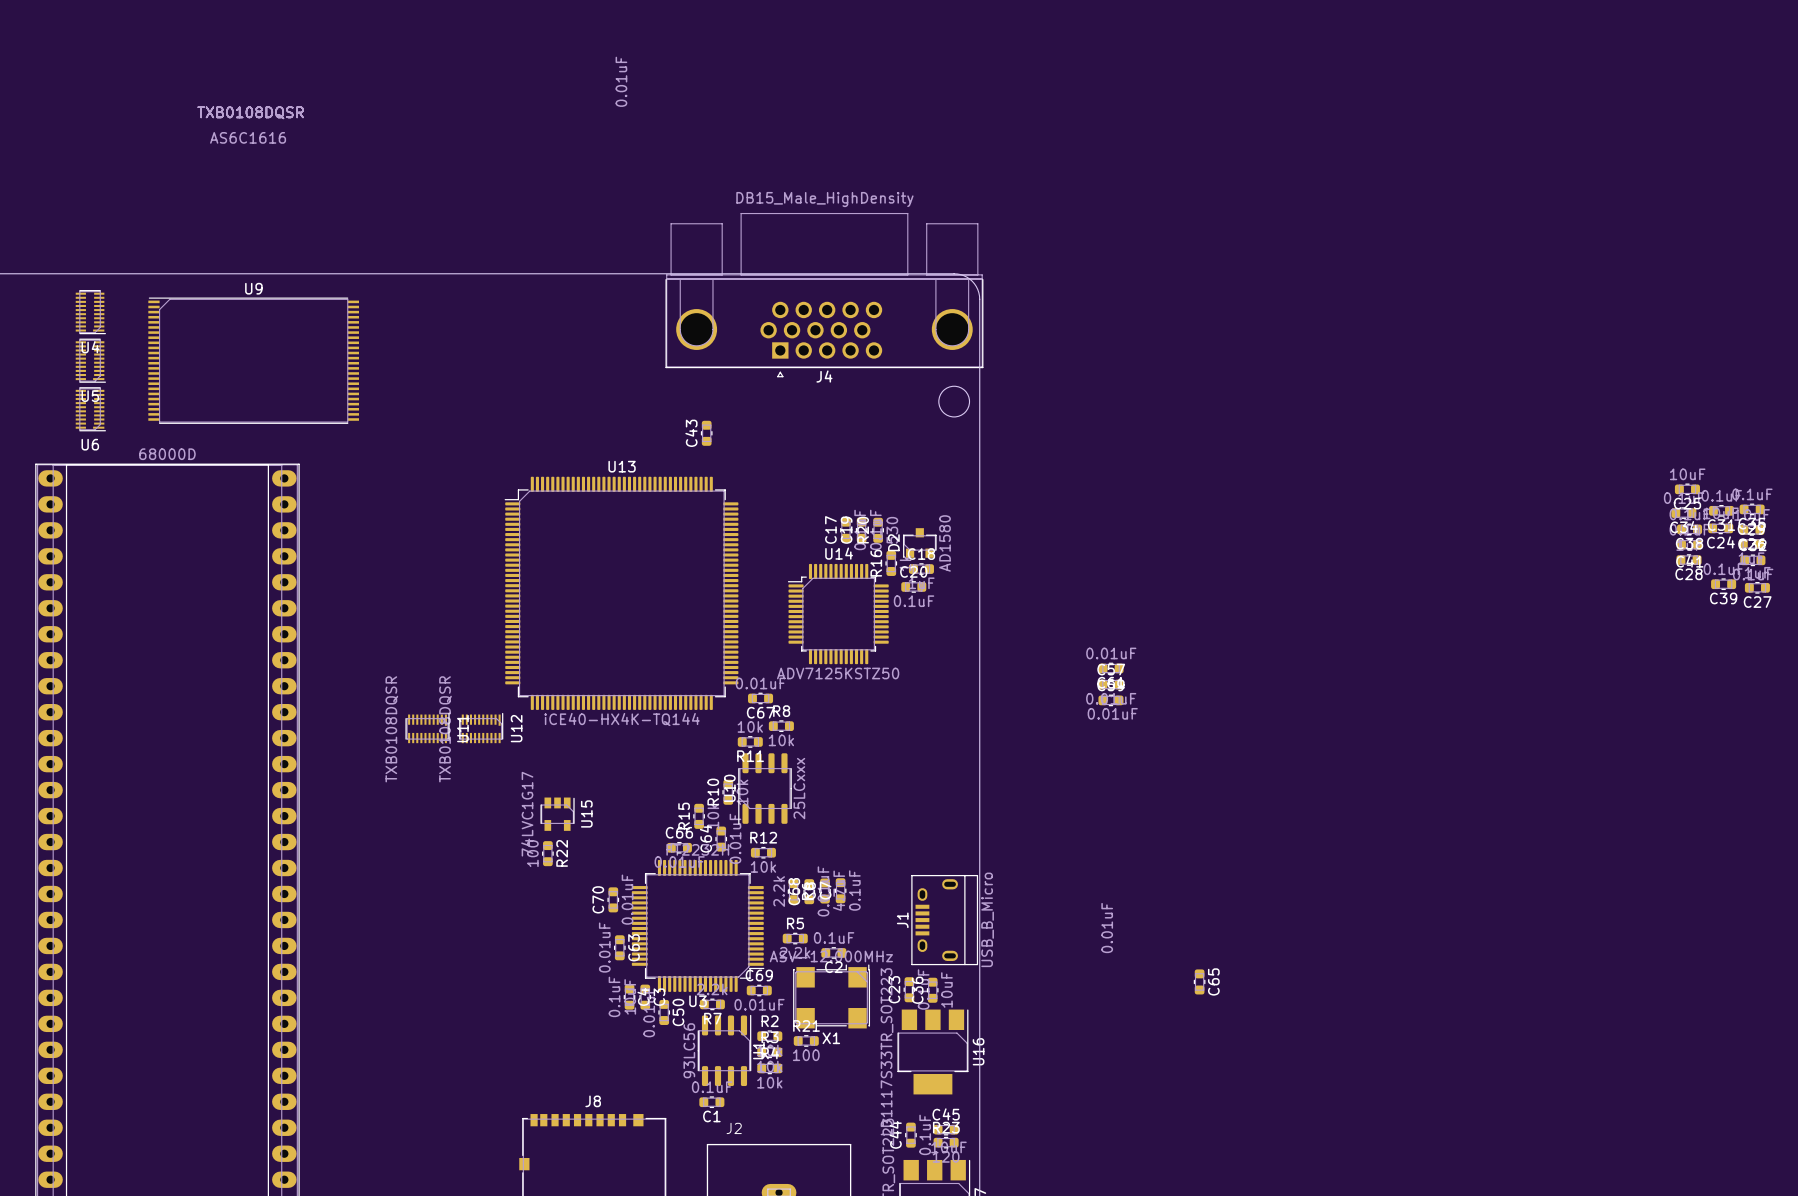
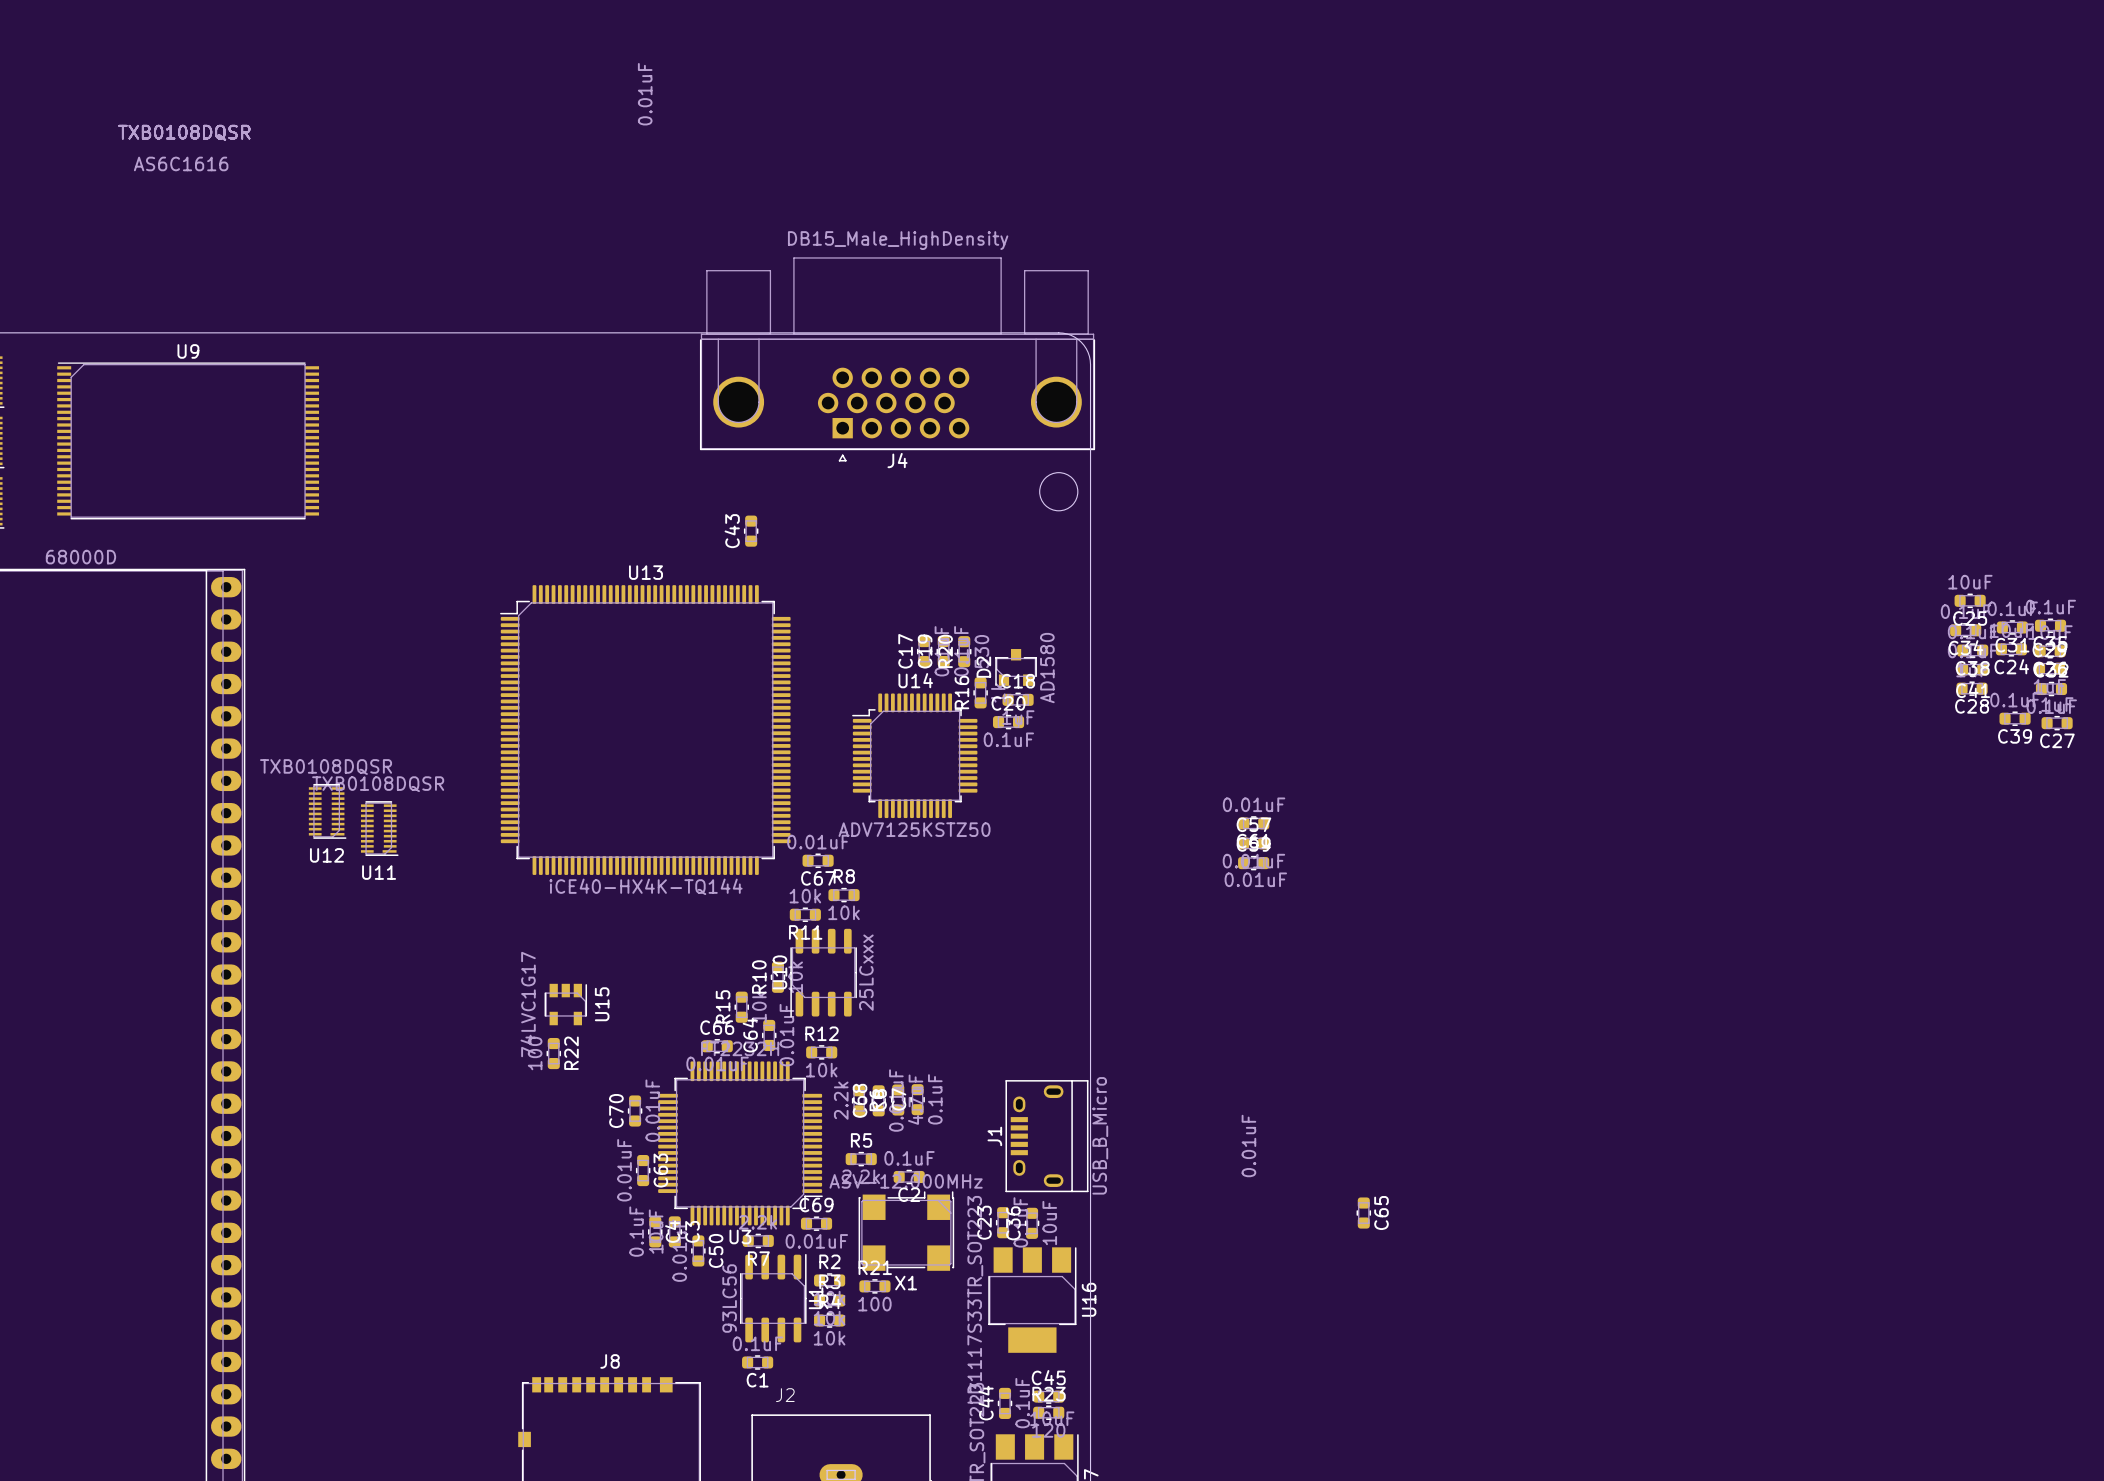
U11 rotation: 0° (427, 728) -> 90° clockwise (379, 828)
U11 position: (427, 728) -> (379, 828)
U12 rotation: 0° (481, 728) -> 90° clockwise (327, 811)
U12 position: (481, 728) -> (327, 811)

